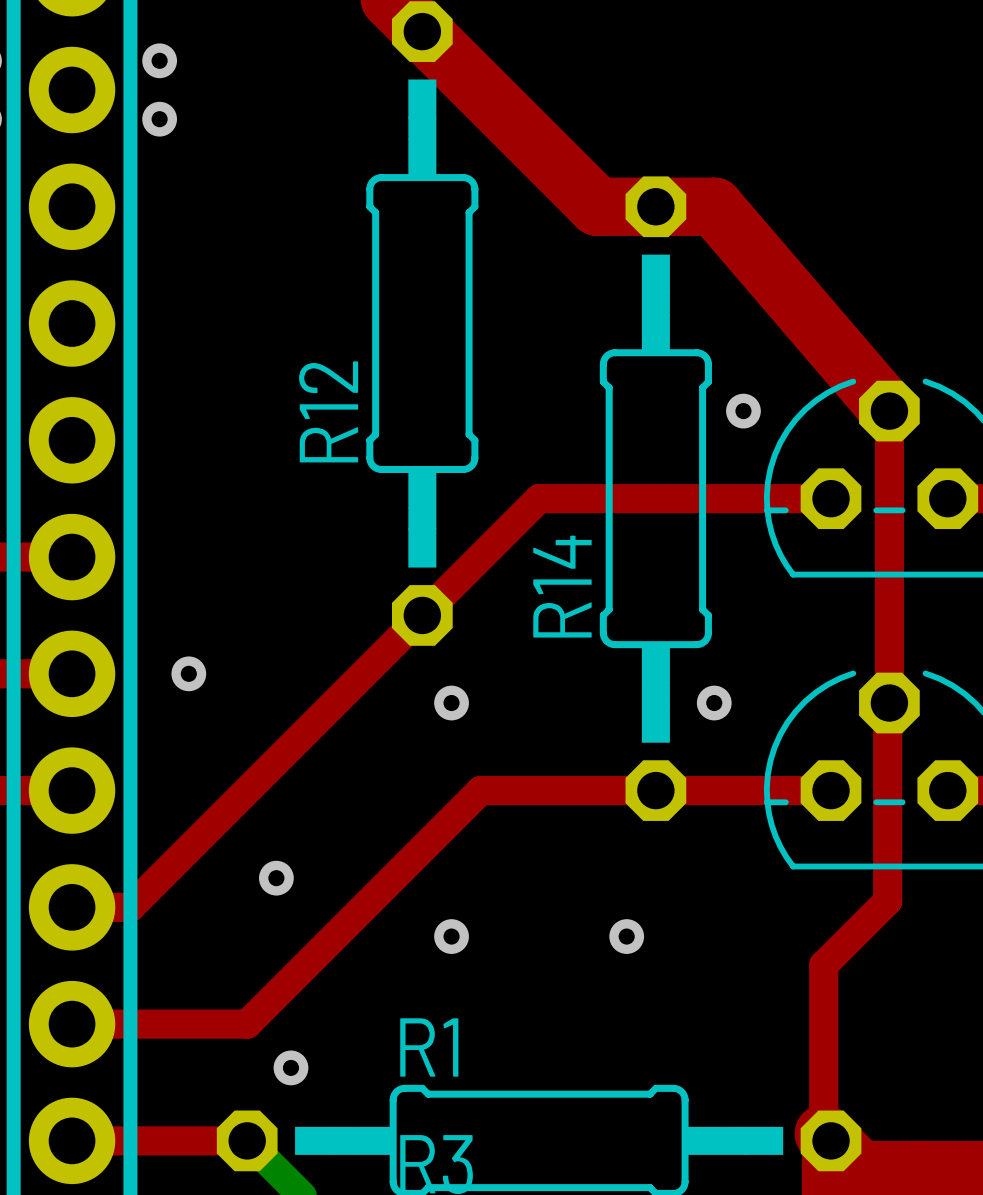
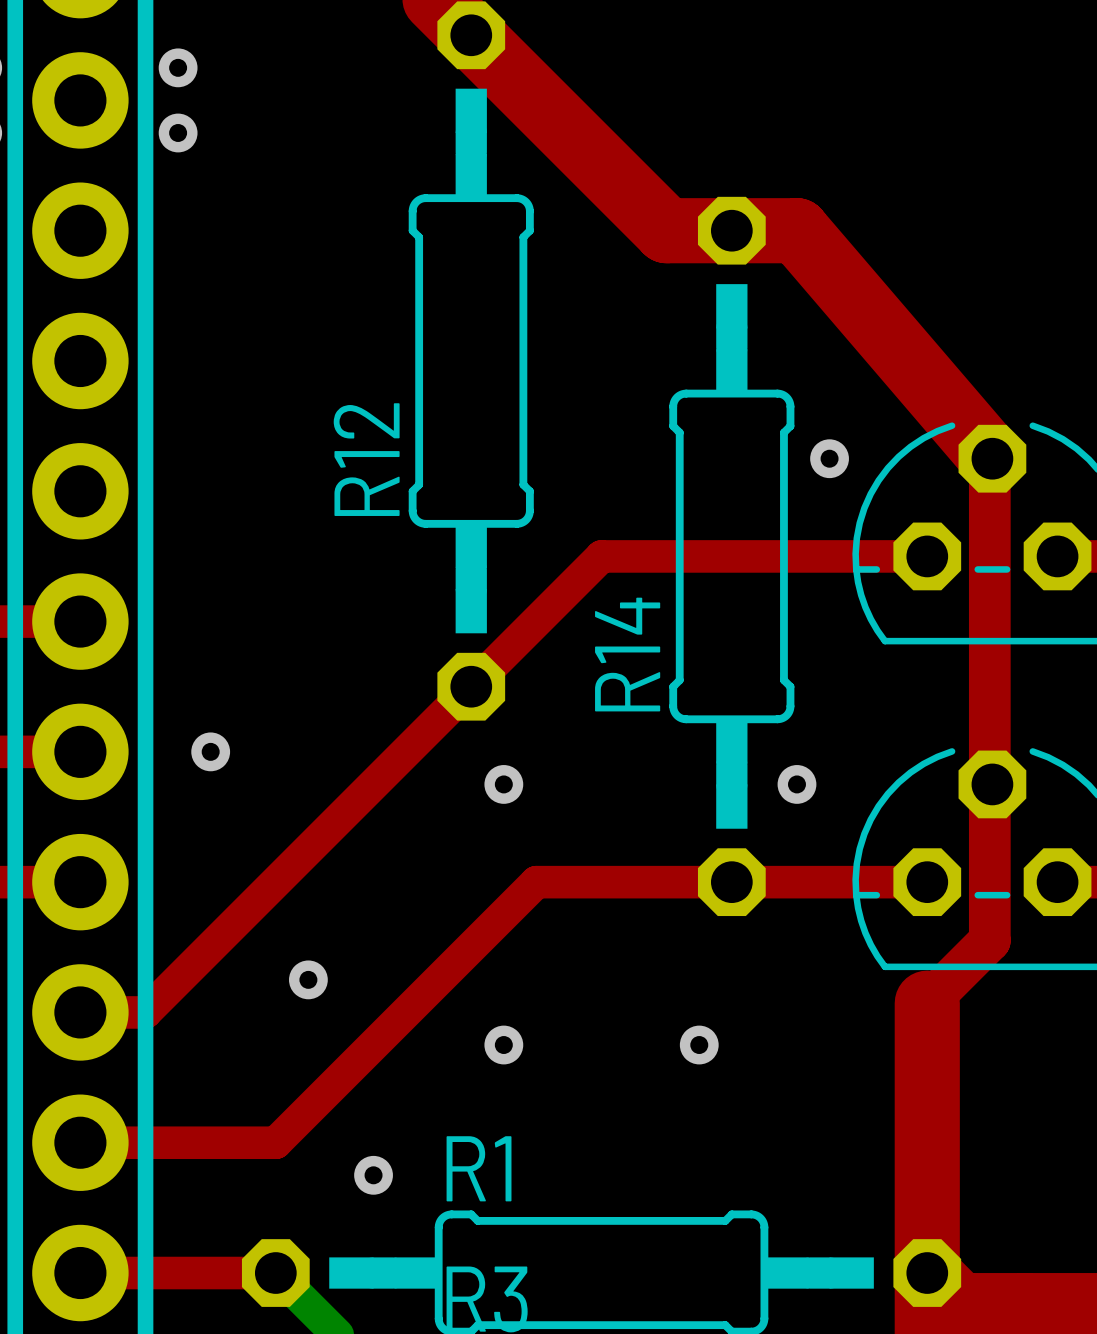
top track: (887, 708) (887, 901) (823, 965) (823, 1133) (831, 1140) -> (989, 461) (989, 940) (927, 1003) (927, 1273)
via position: (290, 1067) -> (373, 1175)

